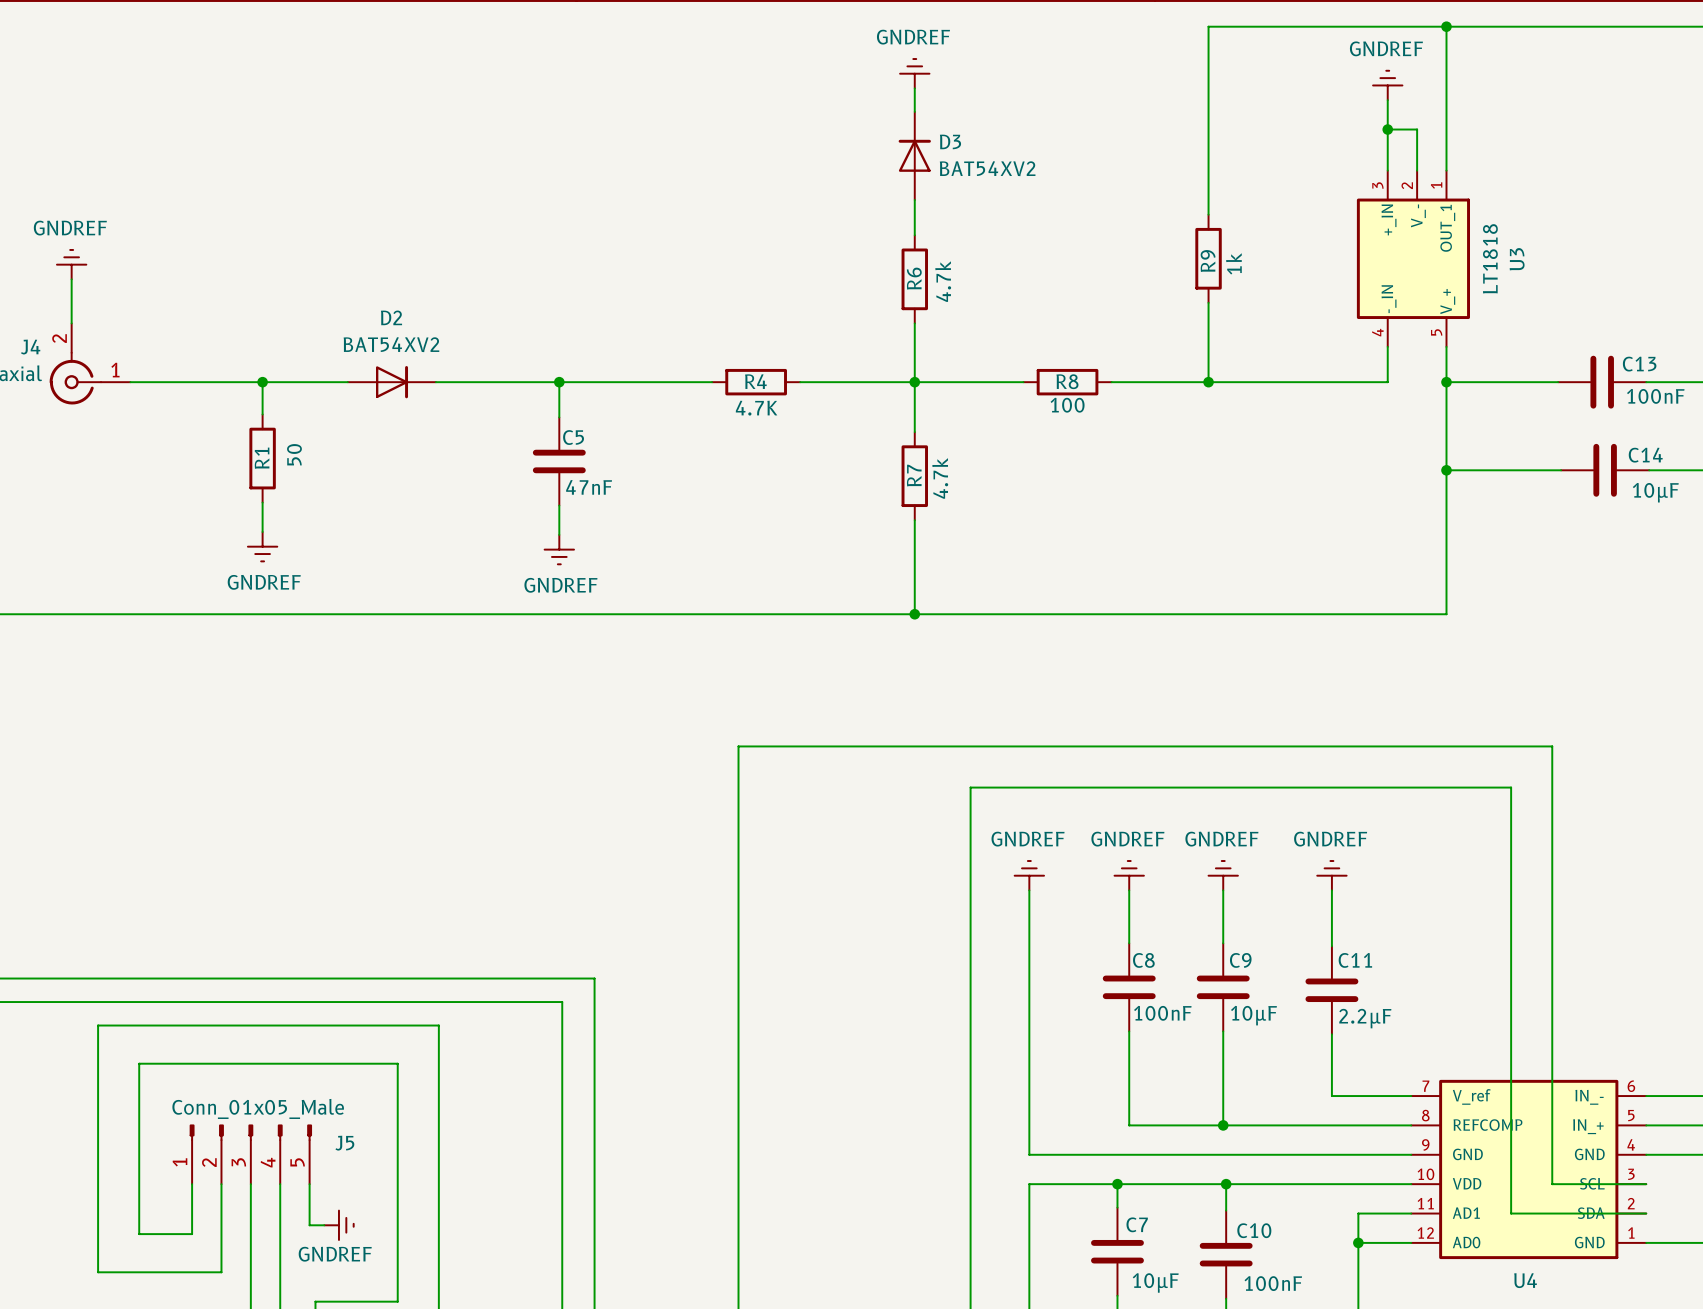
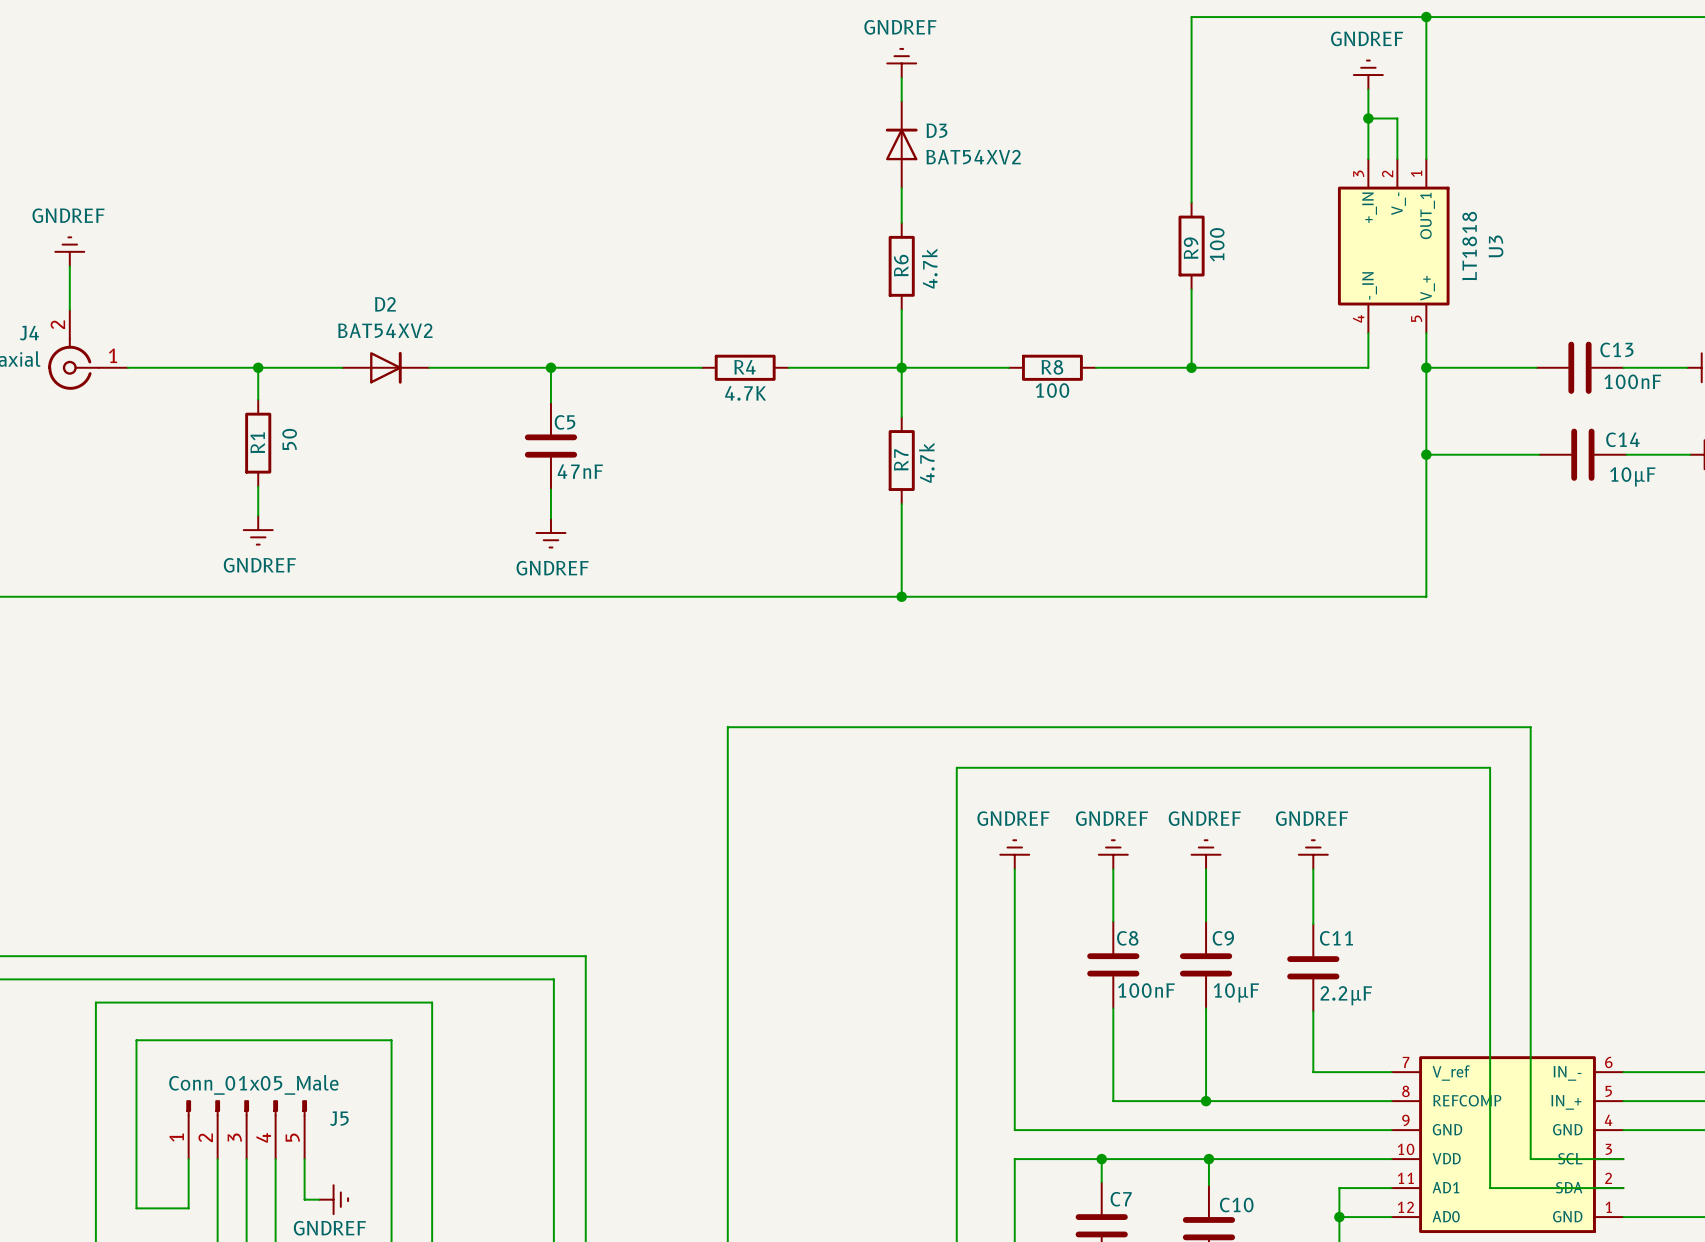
R9 value: 1k (1233, 263) -> 100 (1217, 244)

